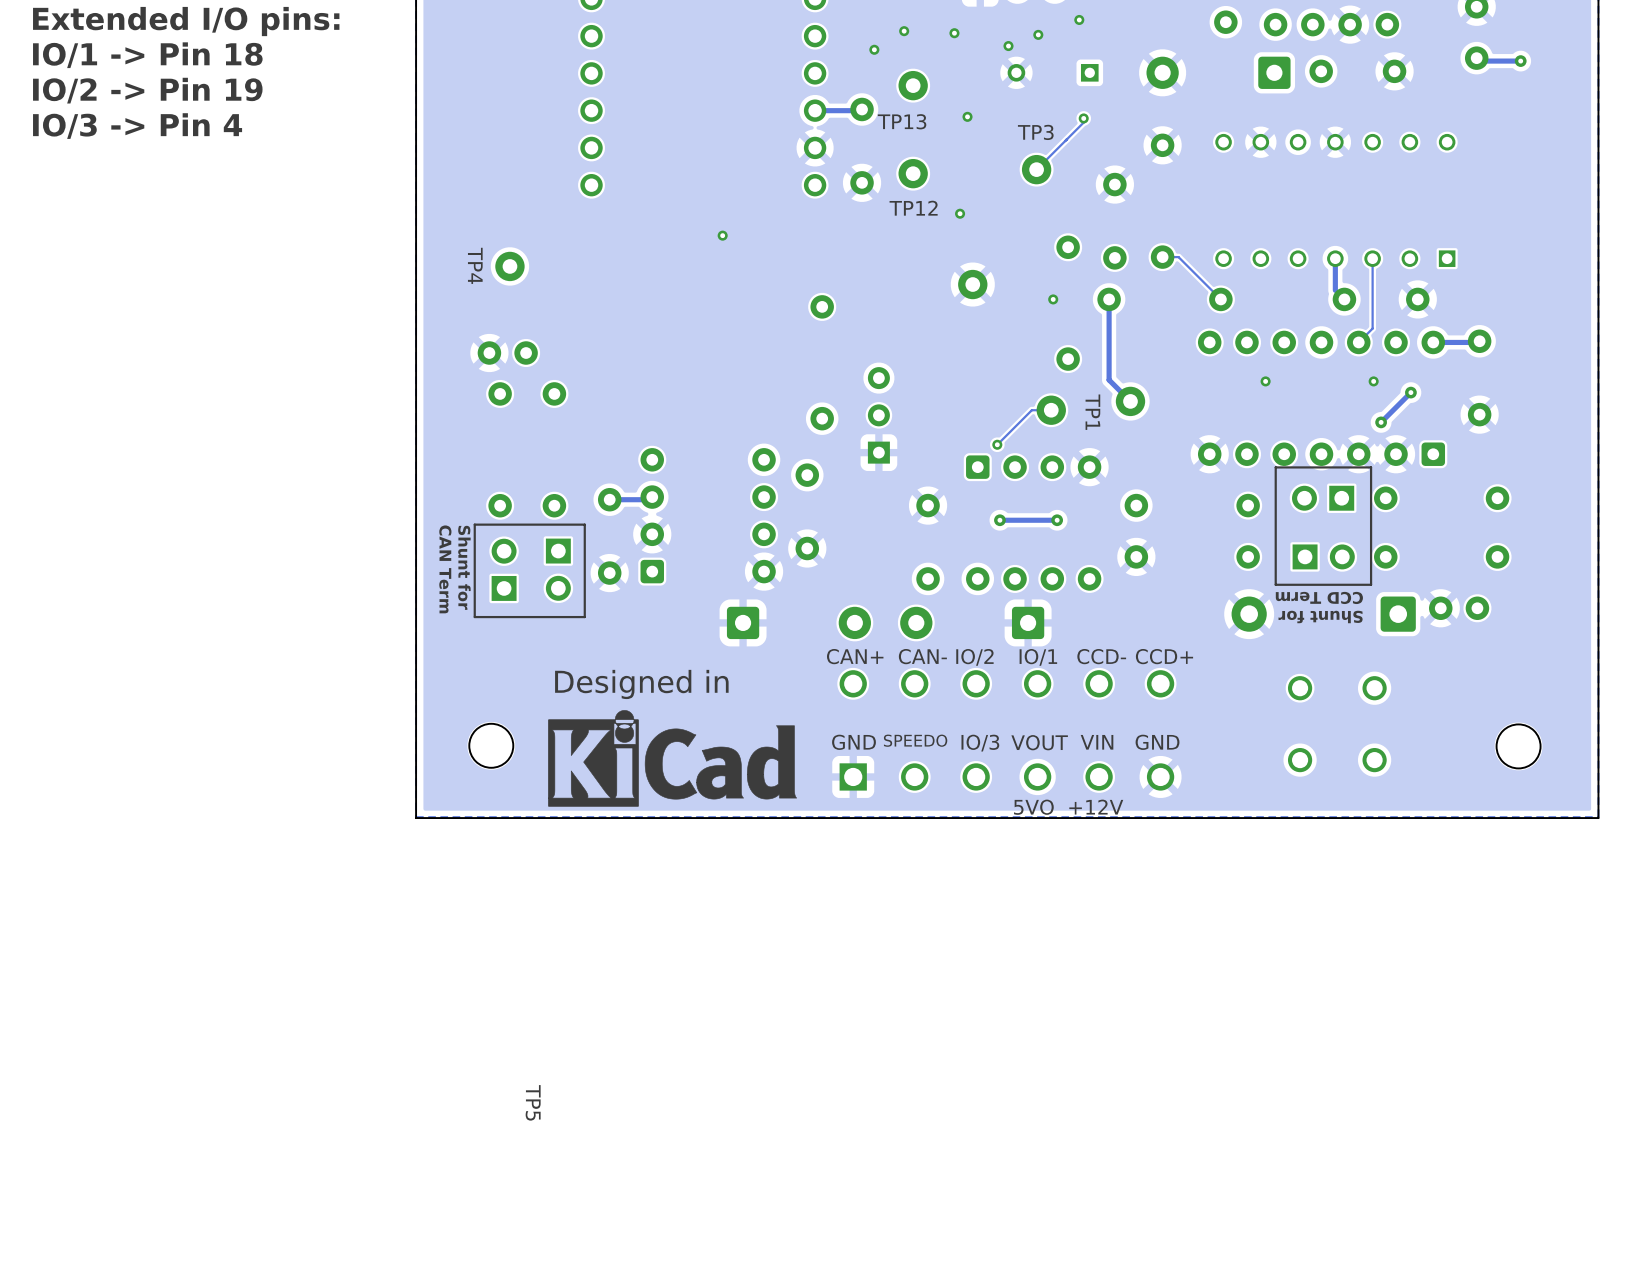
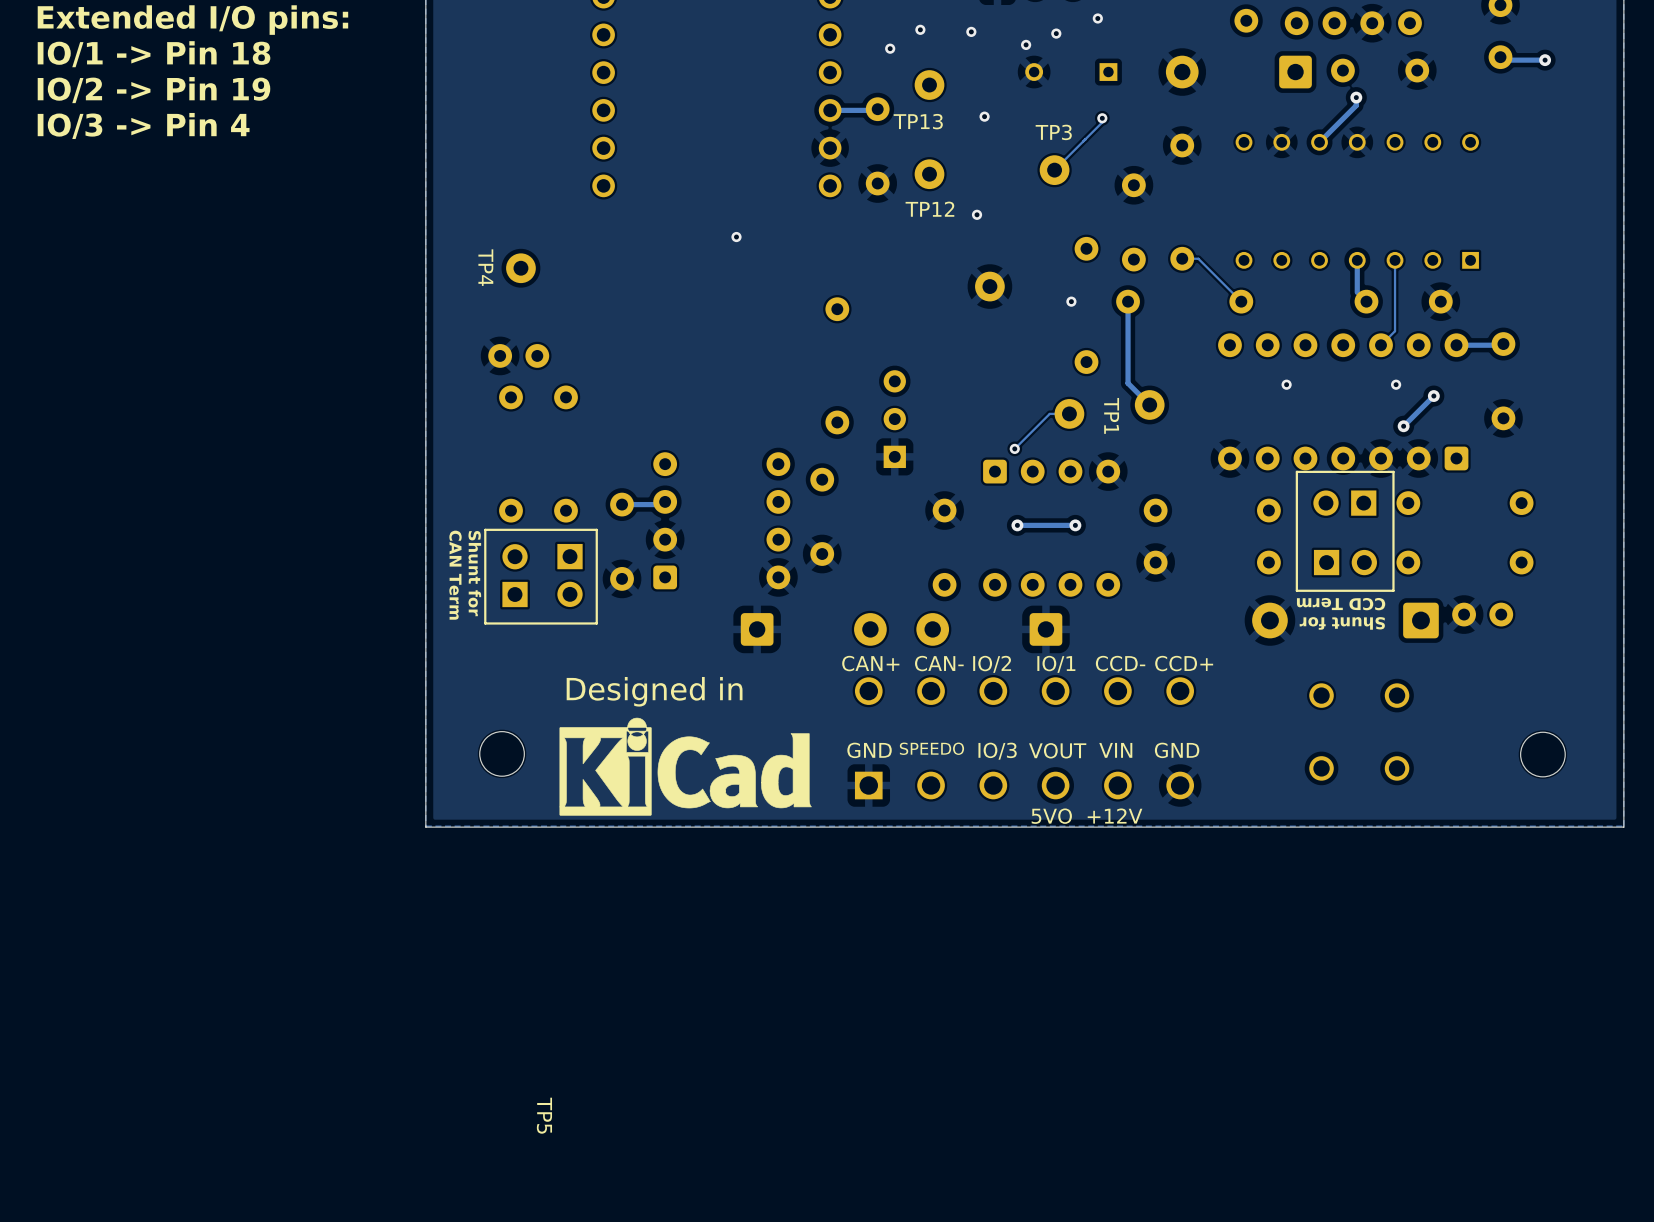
track: none -> (1356, 97) (1356, 105) (1319, 142)
via: none -> (1356, 97)

